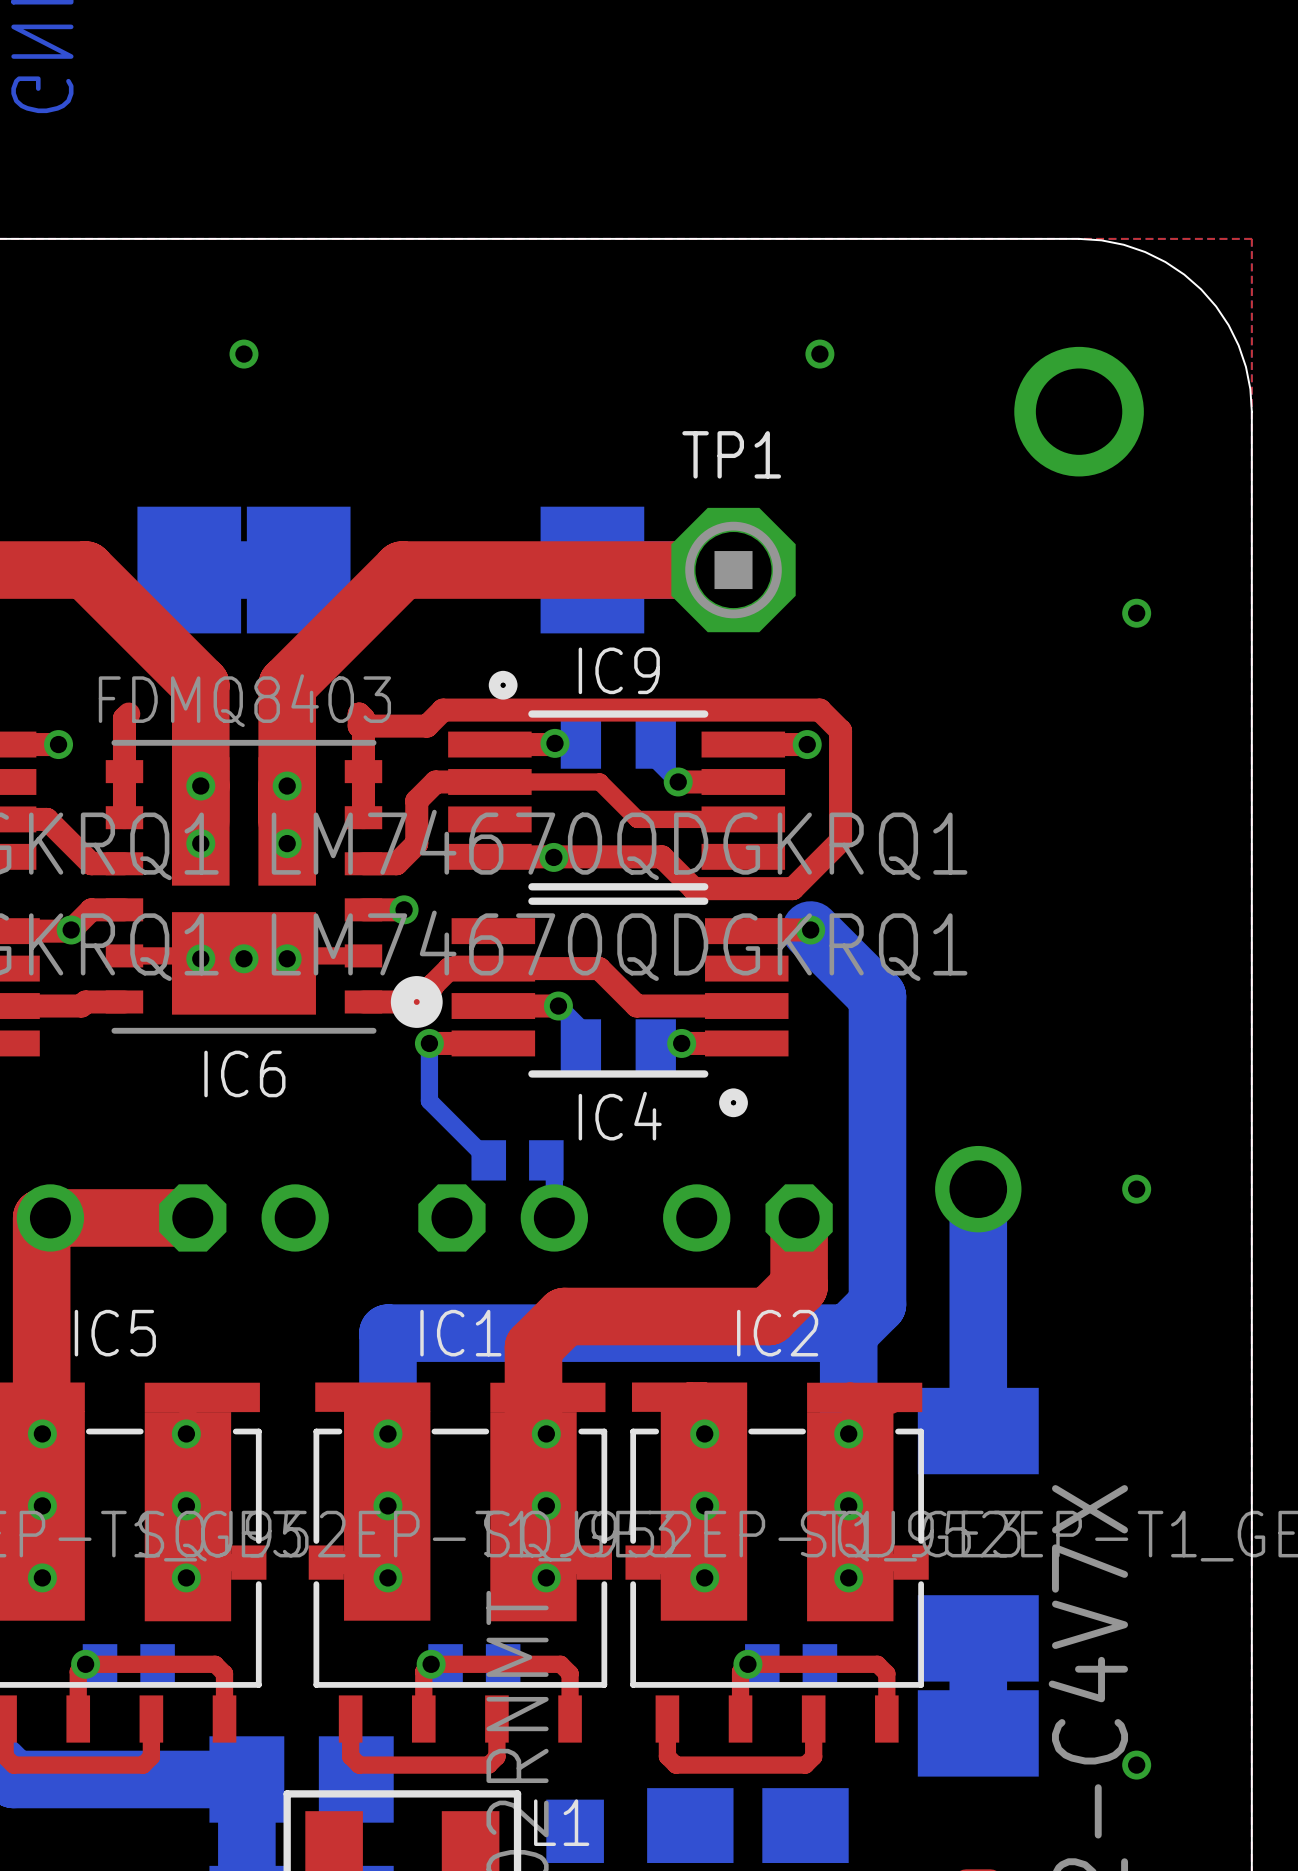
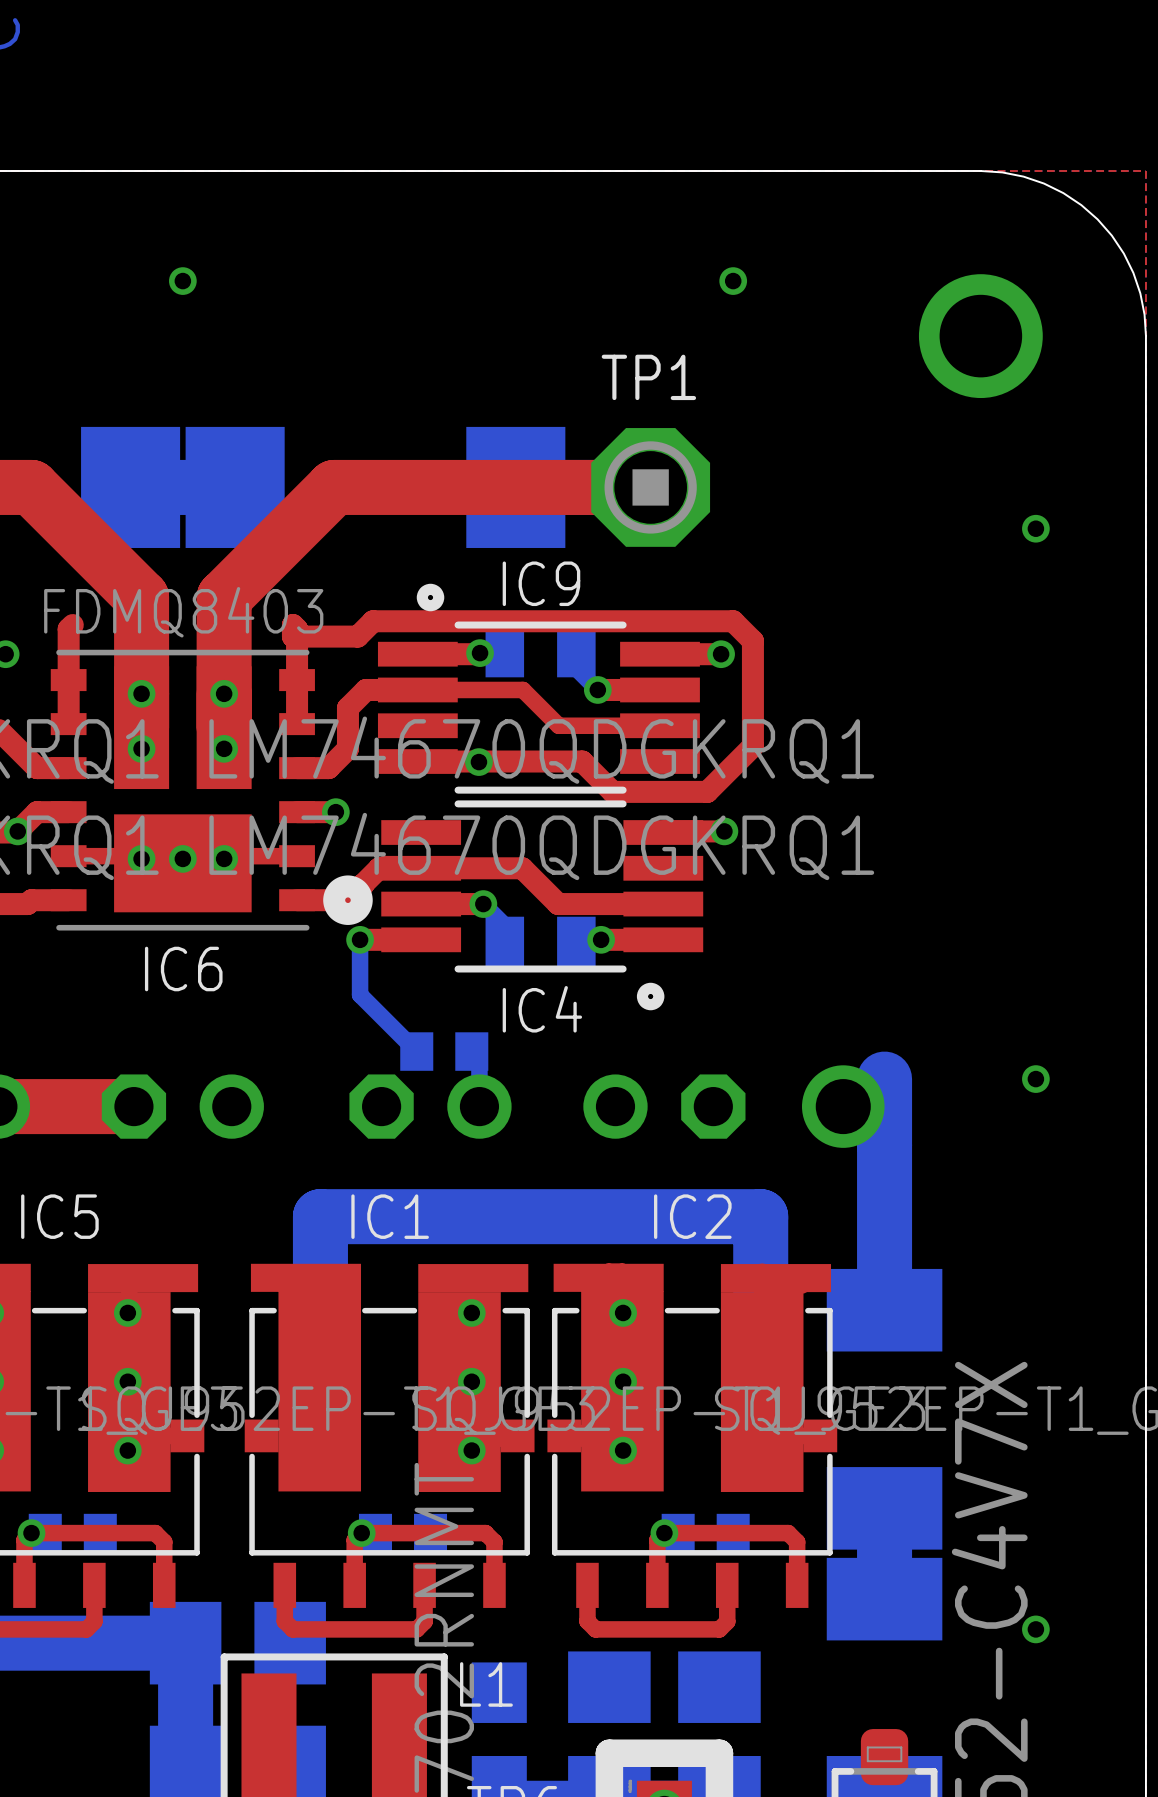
bottom track: (810, 929) (877, 996) (877, 1304) (848, 1333) -> none
via position: (978, 1189) -> (843, 1106)
top track: (799, 1217) (799, 1286) (768, 1316) (564, 1316) (533, 1347) (533, 1516) -> none
via: (387, 1433) -> none
via: (848, 1433) -> none
via: (387, 1505) -> none
via: (848, 1505) -> none
via: (387, 1577) -> none
via: (848, 1577) -> none

